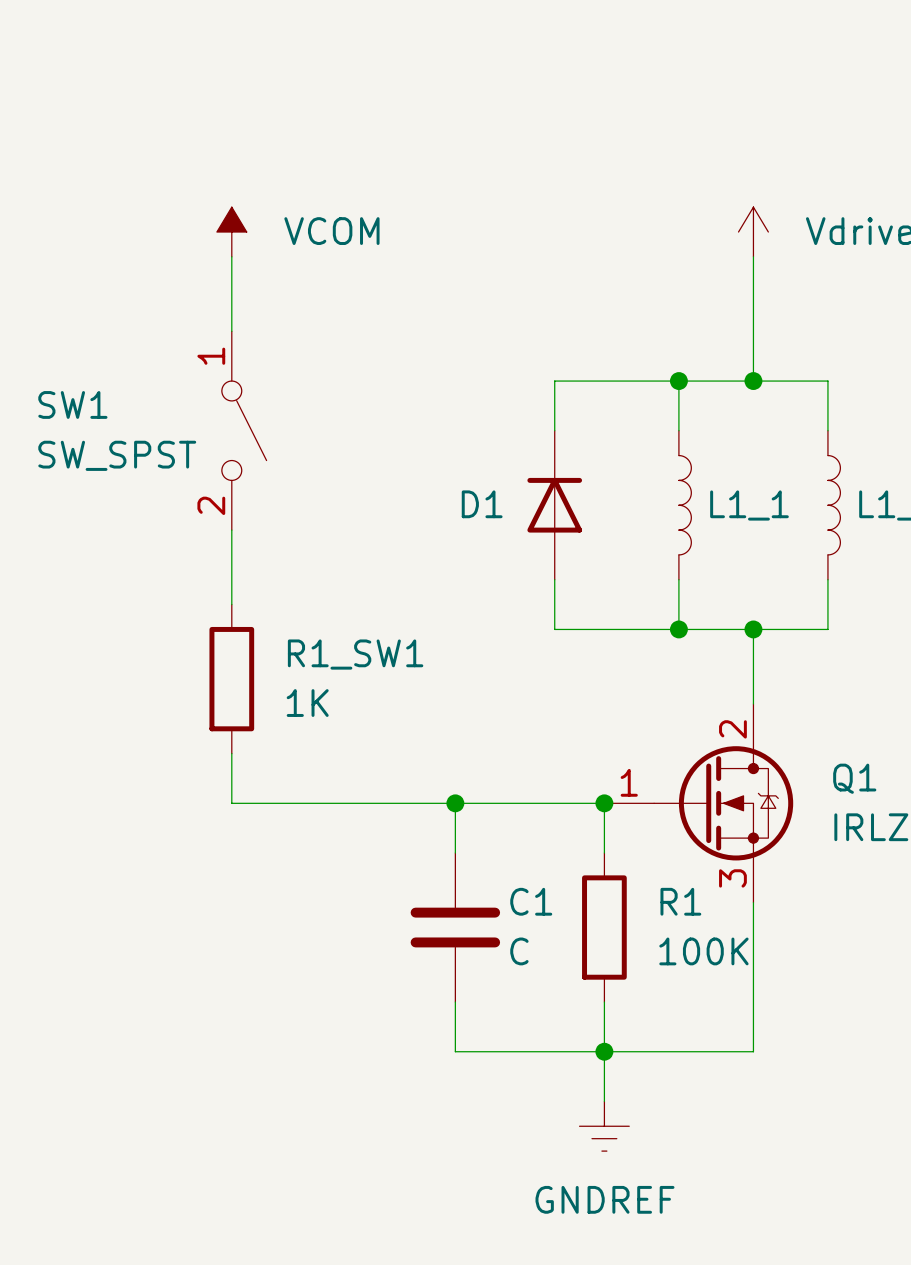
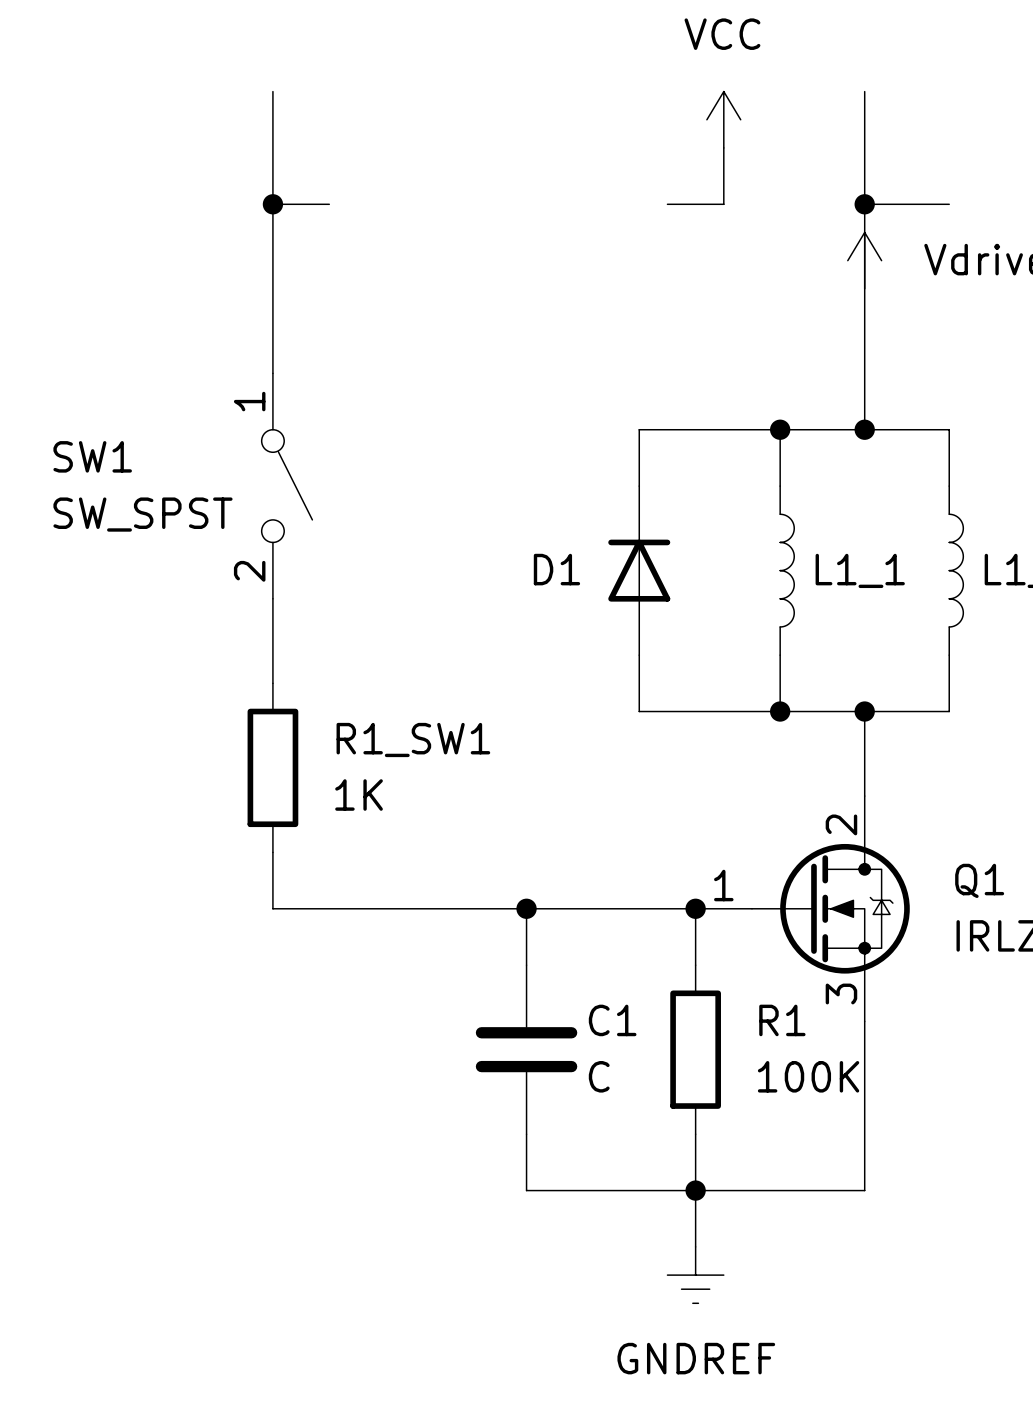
wire: none -> (272, 91) (272, 288)
wire: none -> (864, 91) (864, 288)
power symbol: none -> VCC (723, 119)
wire: none -> (723, 147) (723, 204) (667, 204)
wire: none -> (272, 204) (329, 204)
junction: none -> (272, 204)
wire: none -> (864, 204) (949, 204)
junction: none -> (864, 204)
power symbol: VCOM (231, 232) -> none

